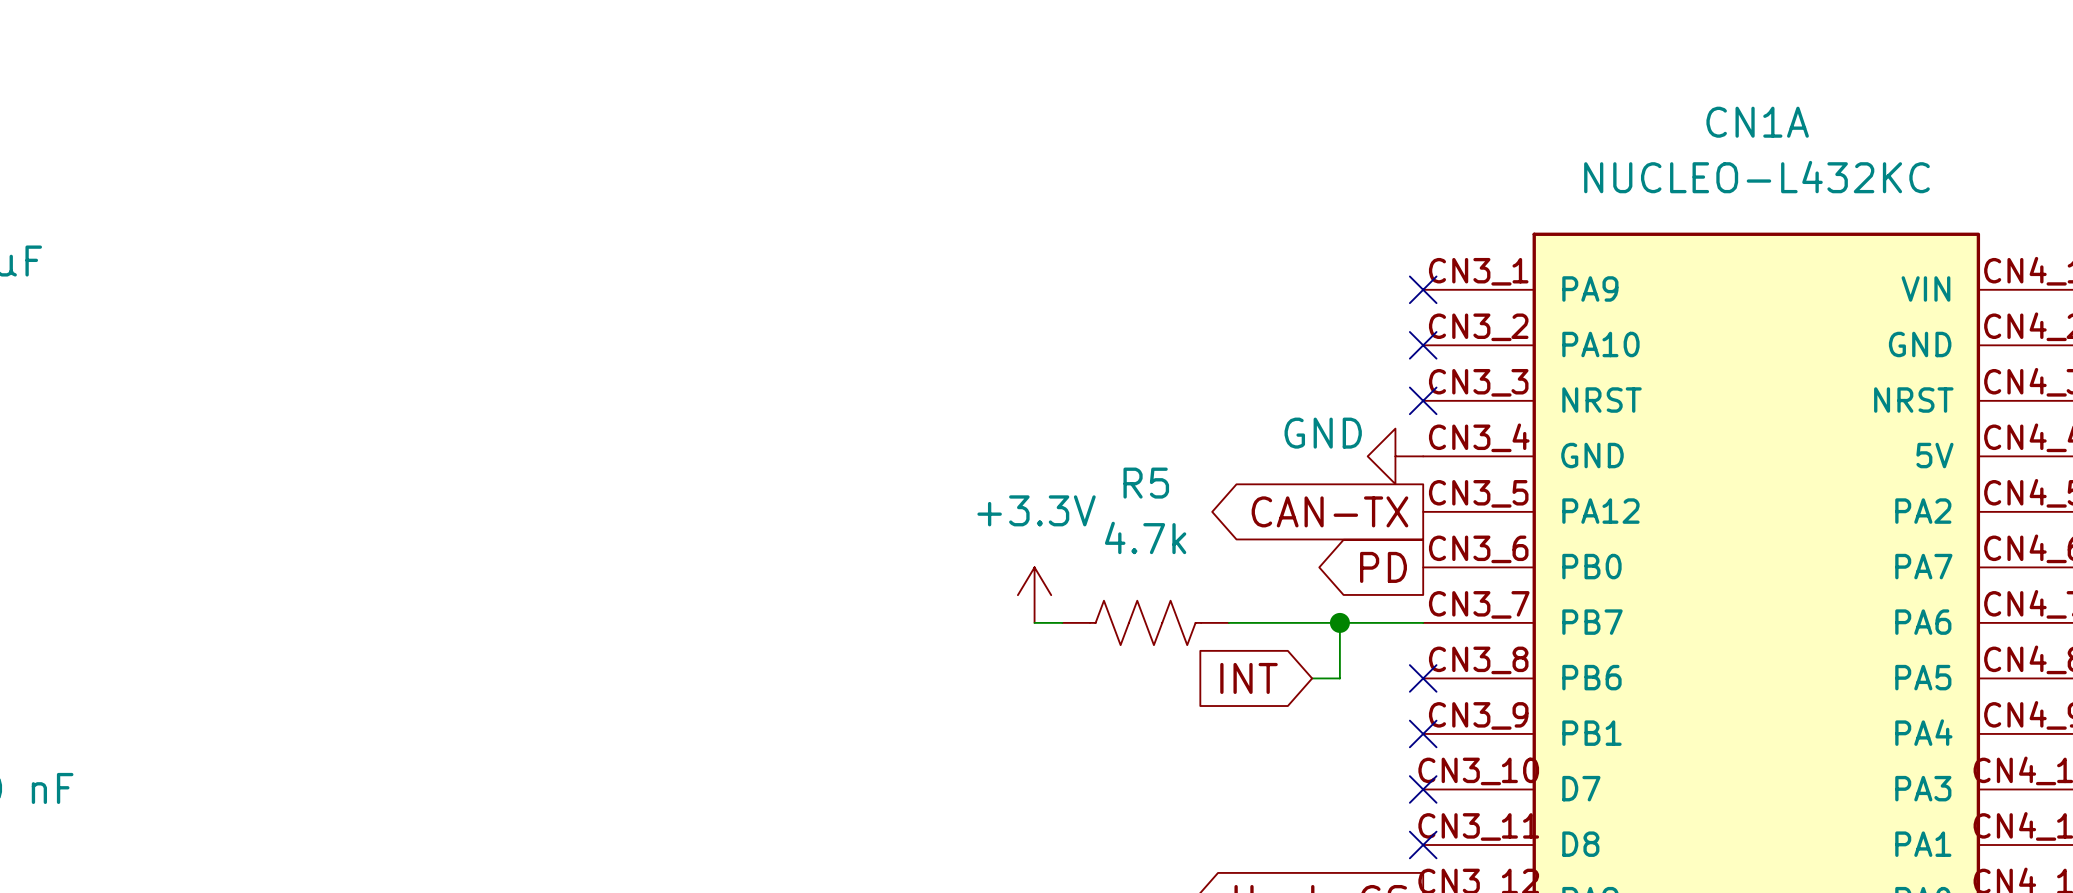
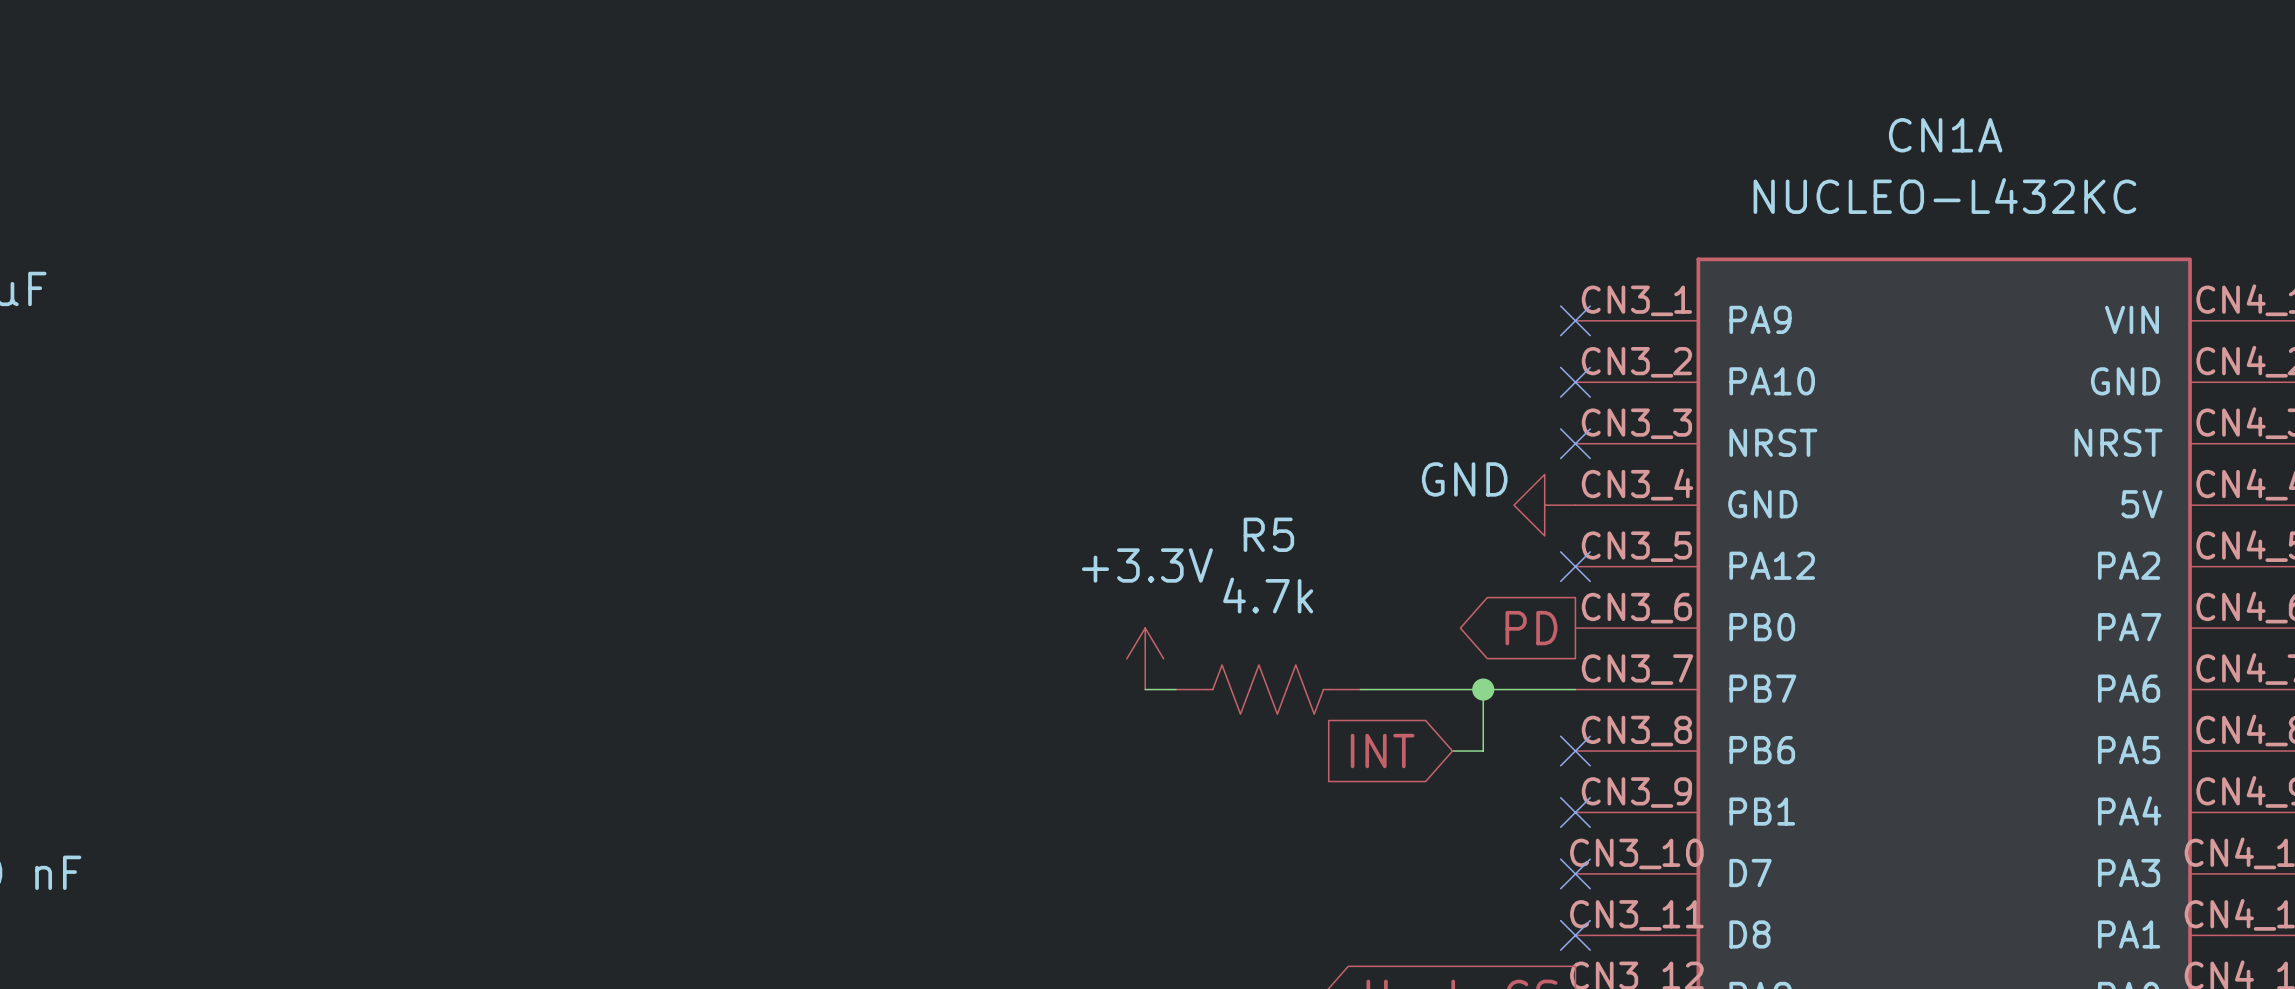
global label: CAN-TX (1329, 511) -> none
no-connect mark: none -> (1575, 566)

